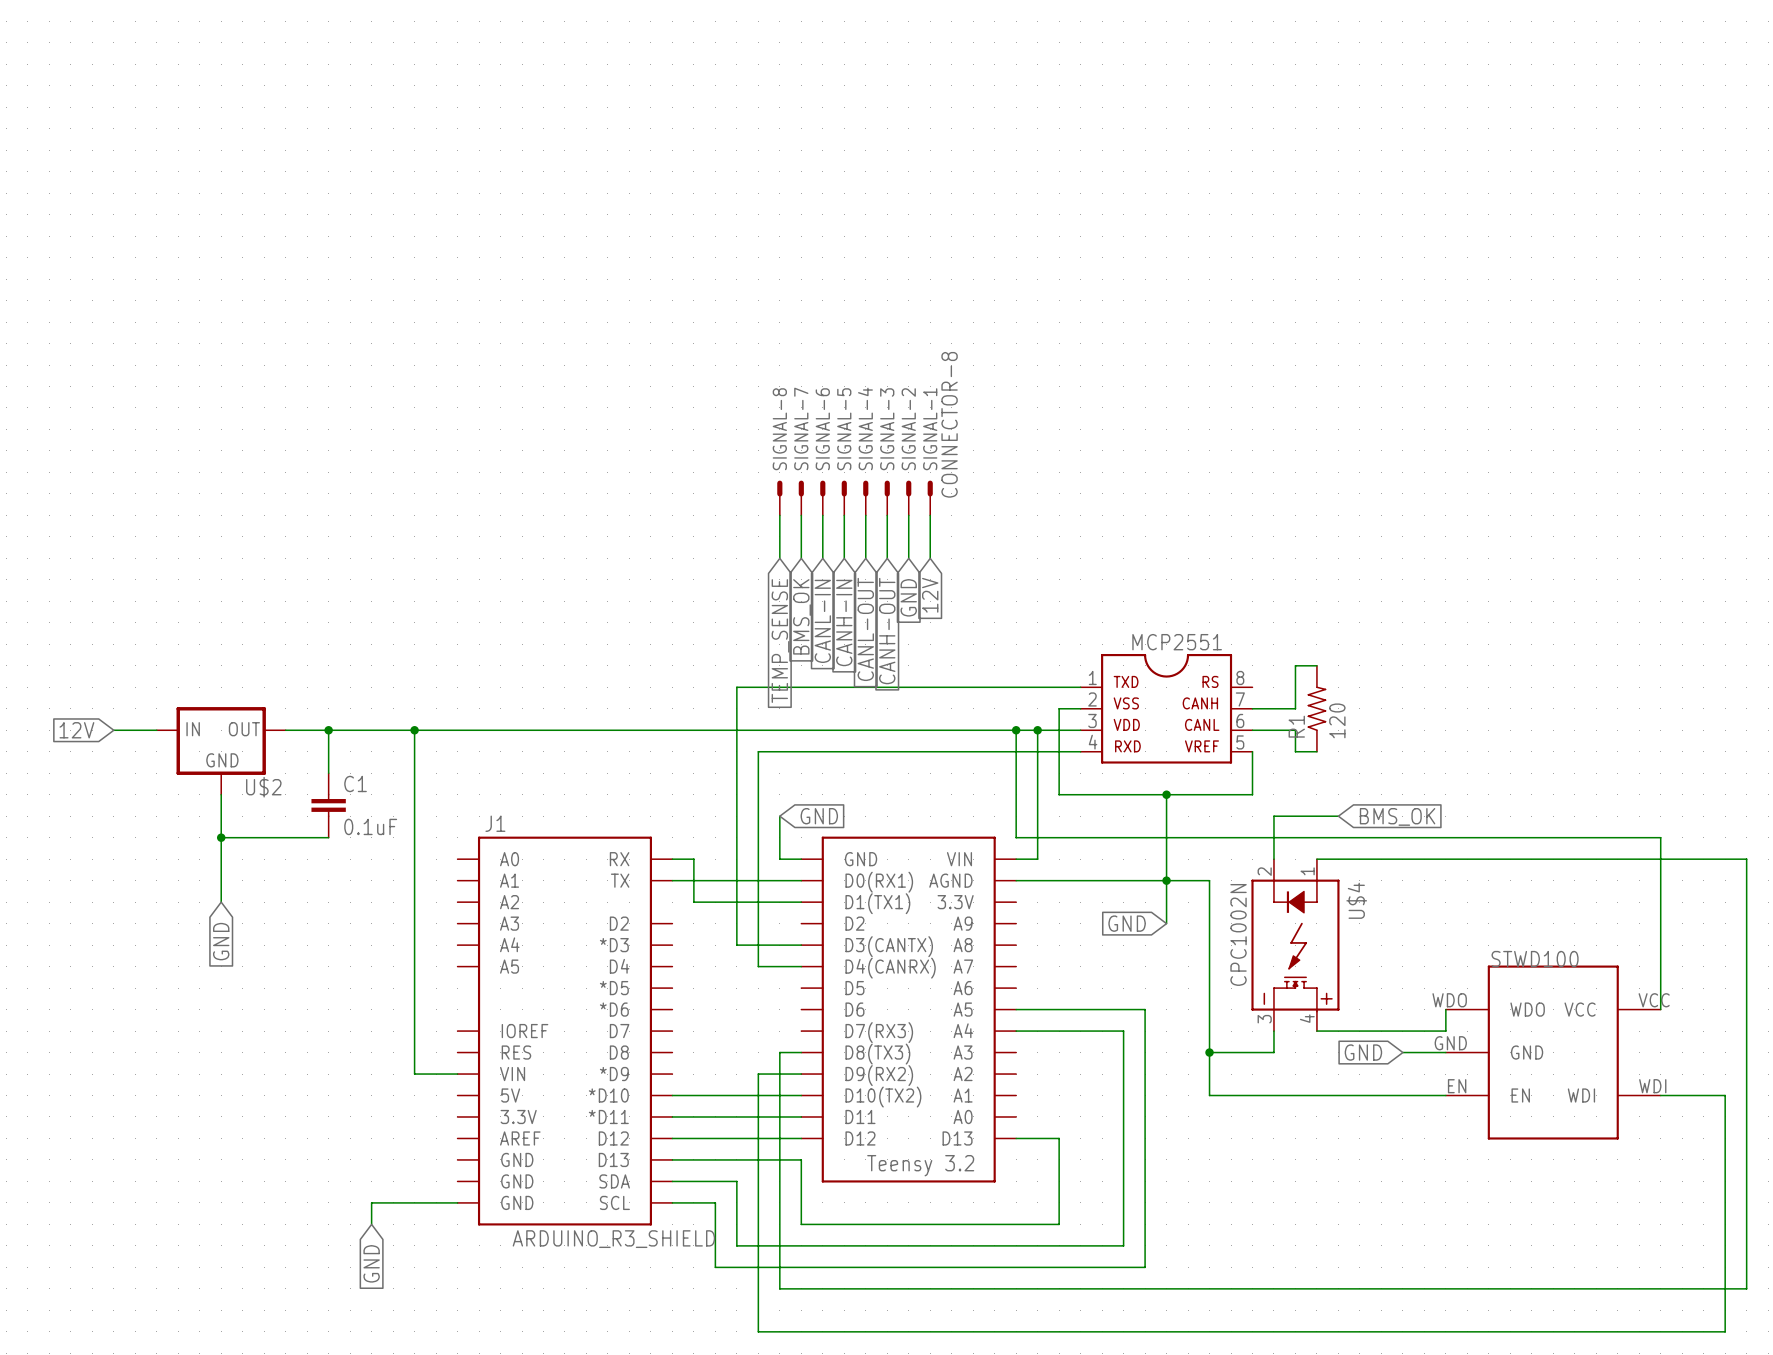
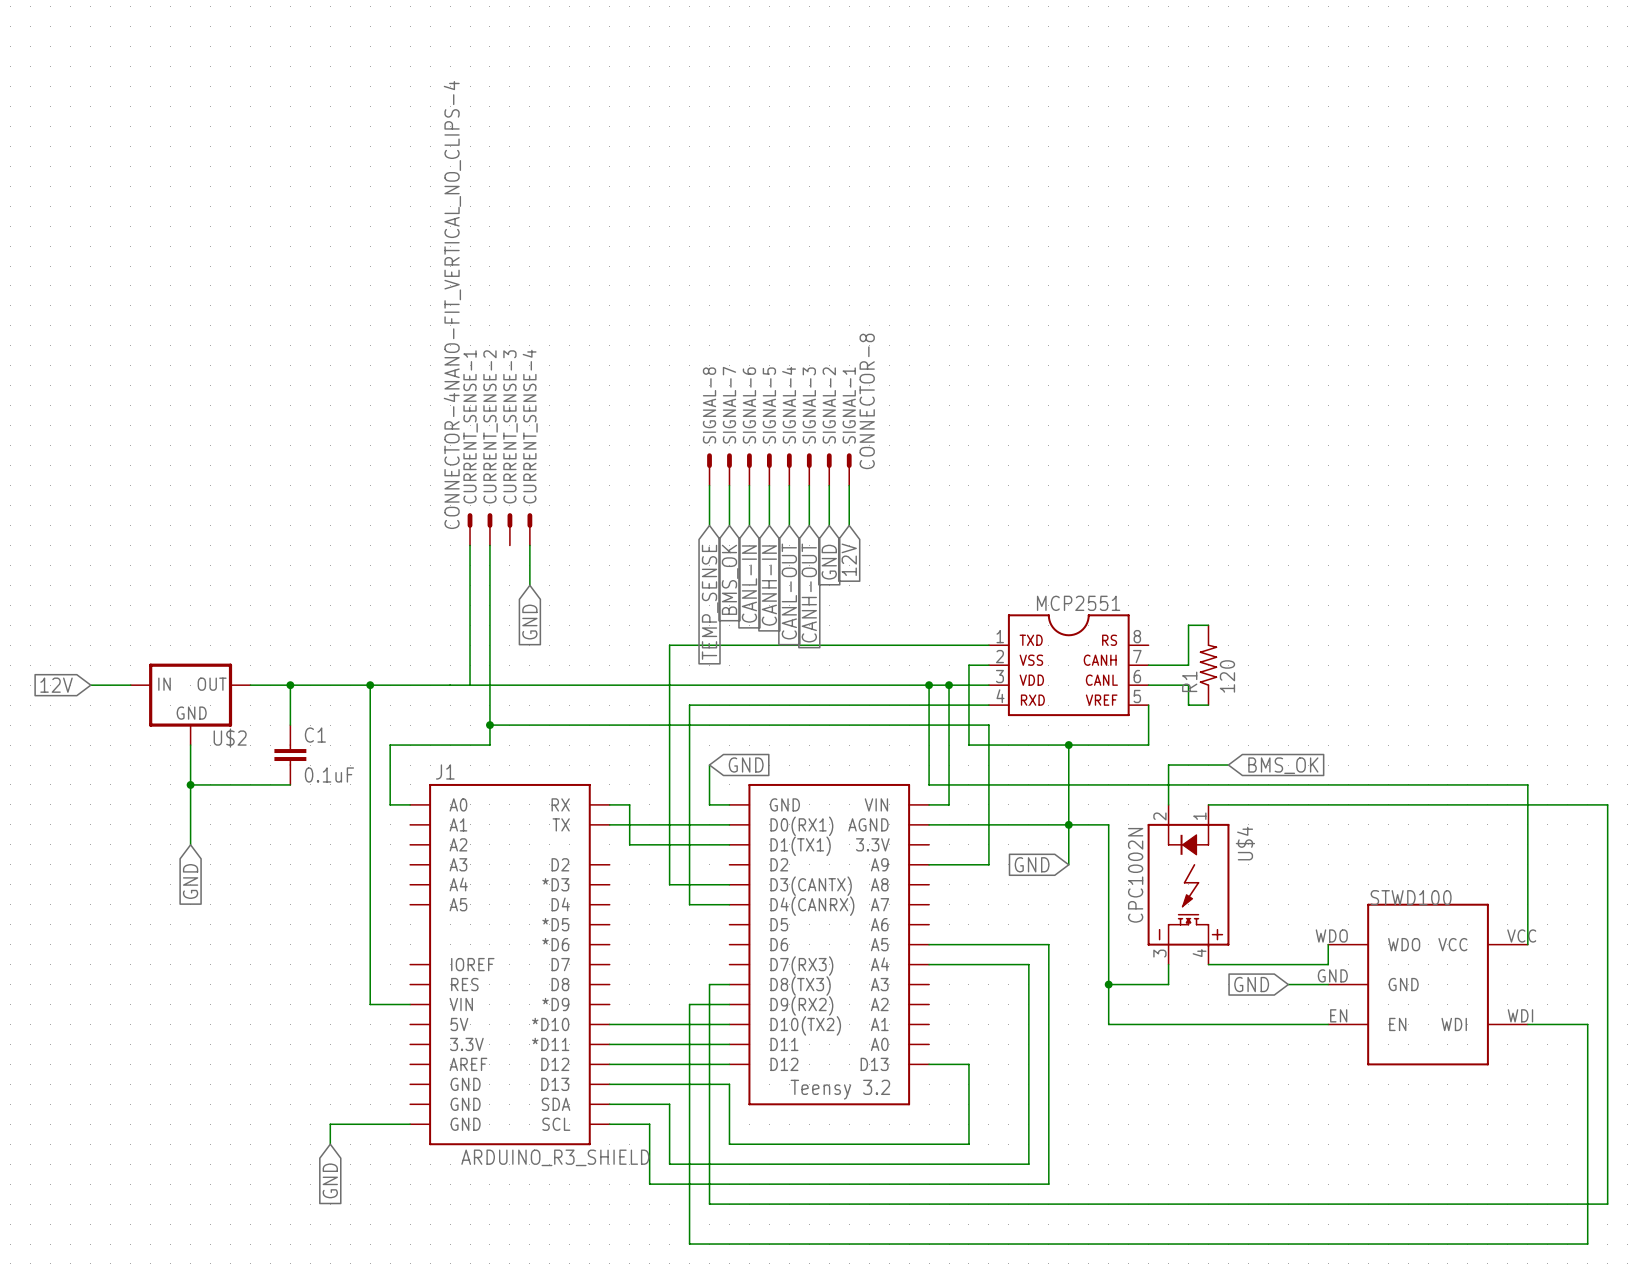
CURRENT_SENSE-1: none -> CONNECTOR-4NANO-FIT_VERTICAL_NO_CLIPS-4 (470, 529)
CURRENT_SENSE-2: none -> (489, 529)
CURRENT_SENSE-3: none -> (509, 529)
CURRENT_SENSE-4: none -> (529, 529)
wire: none -> (470, 545) (470, 685)
wire: none -> (489, 545) (489, 745) (390, 745) (390, 804) (410, 804)
wire: none -> (529, 545) (529, 585)
global label: none -> GND (529, 622)
wire: none -> (489, 725) (988, 725) (988, 864) (929, 864)
junction: none -> (489, 725)

